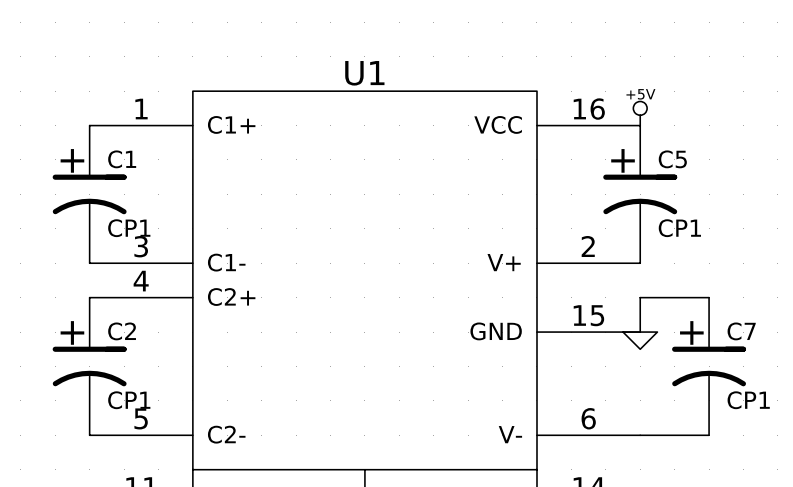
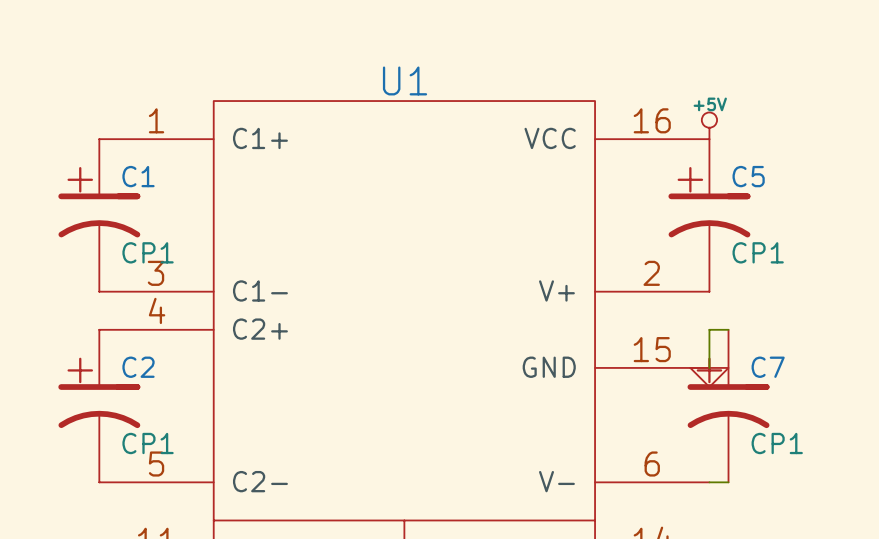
wire: (657, 297) (709, 297) -> none
C7 position: (709, 366) -> (728, 406)
wire: (657, 435) (709, 435) -> none

